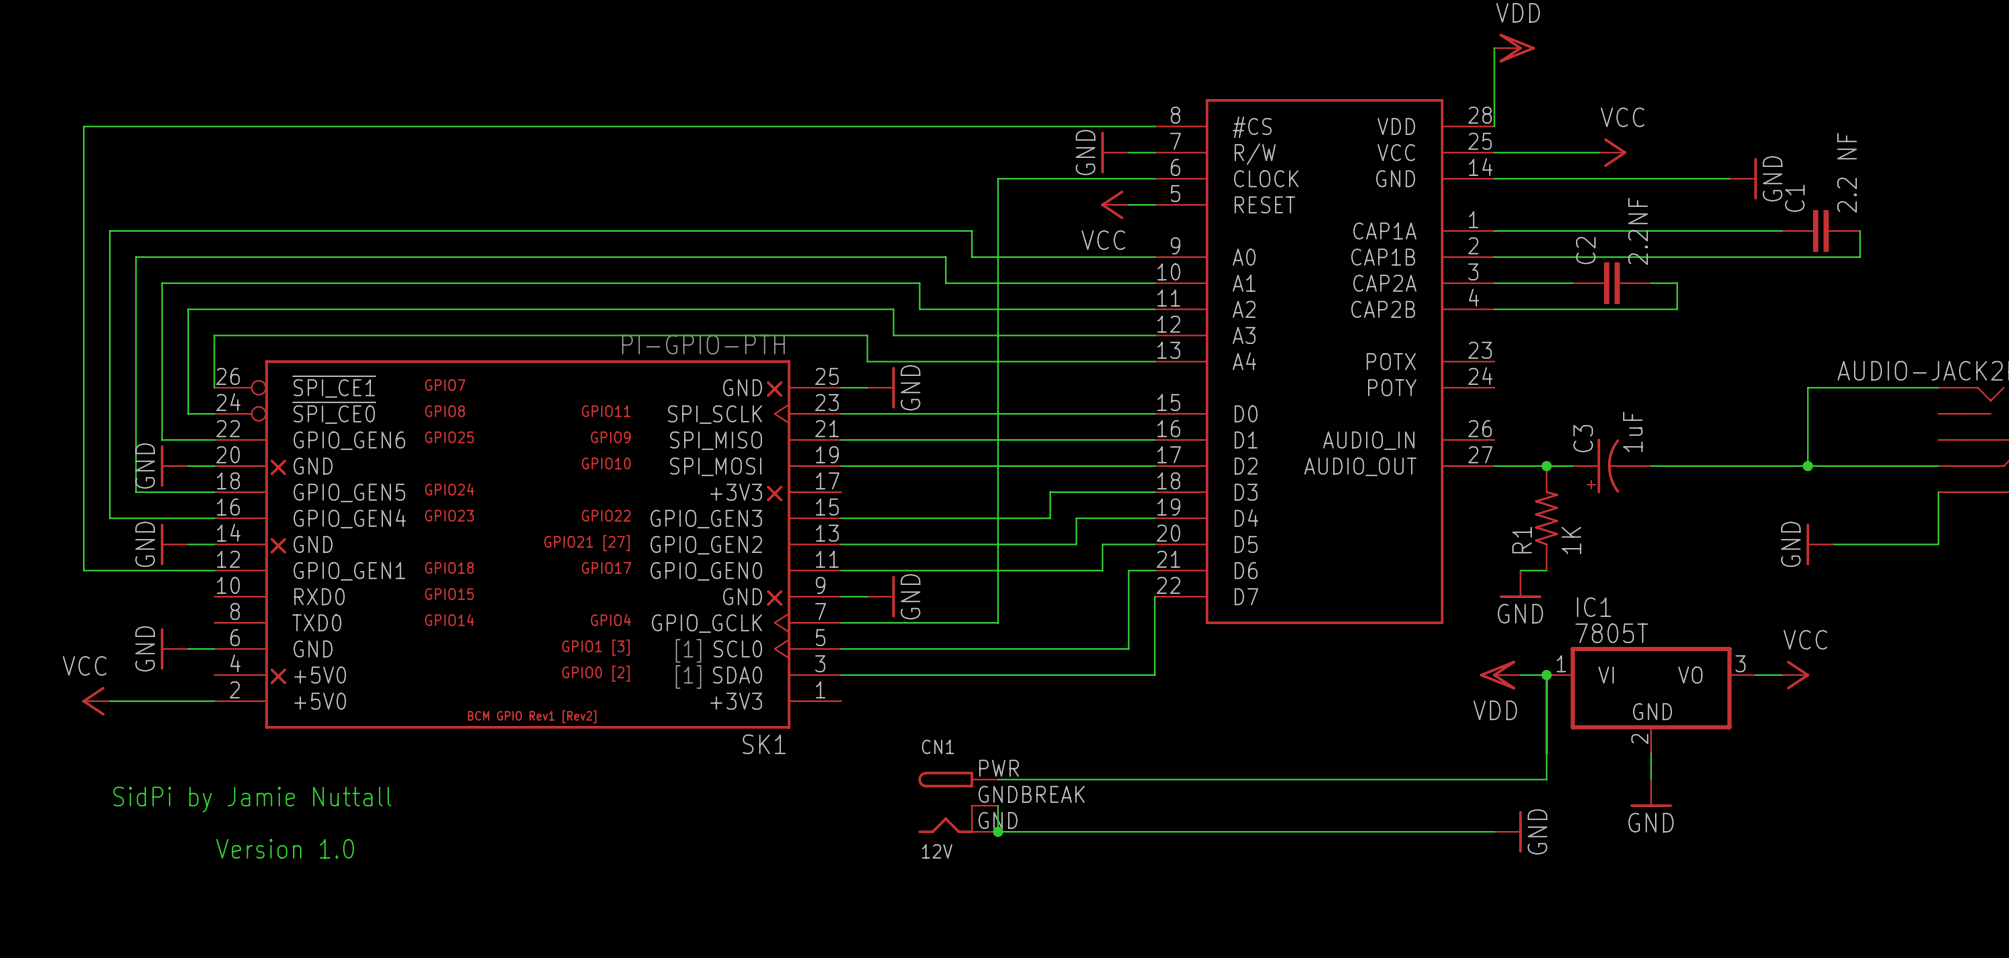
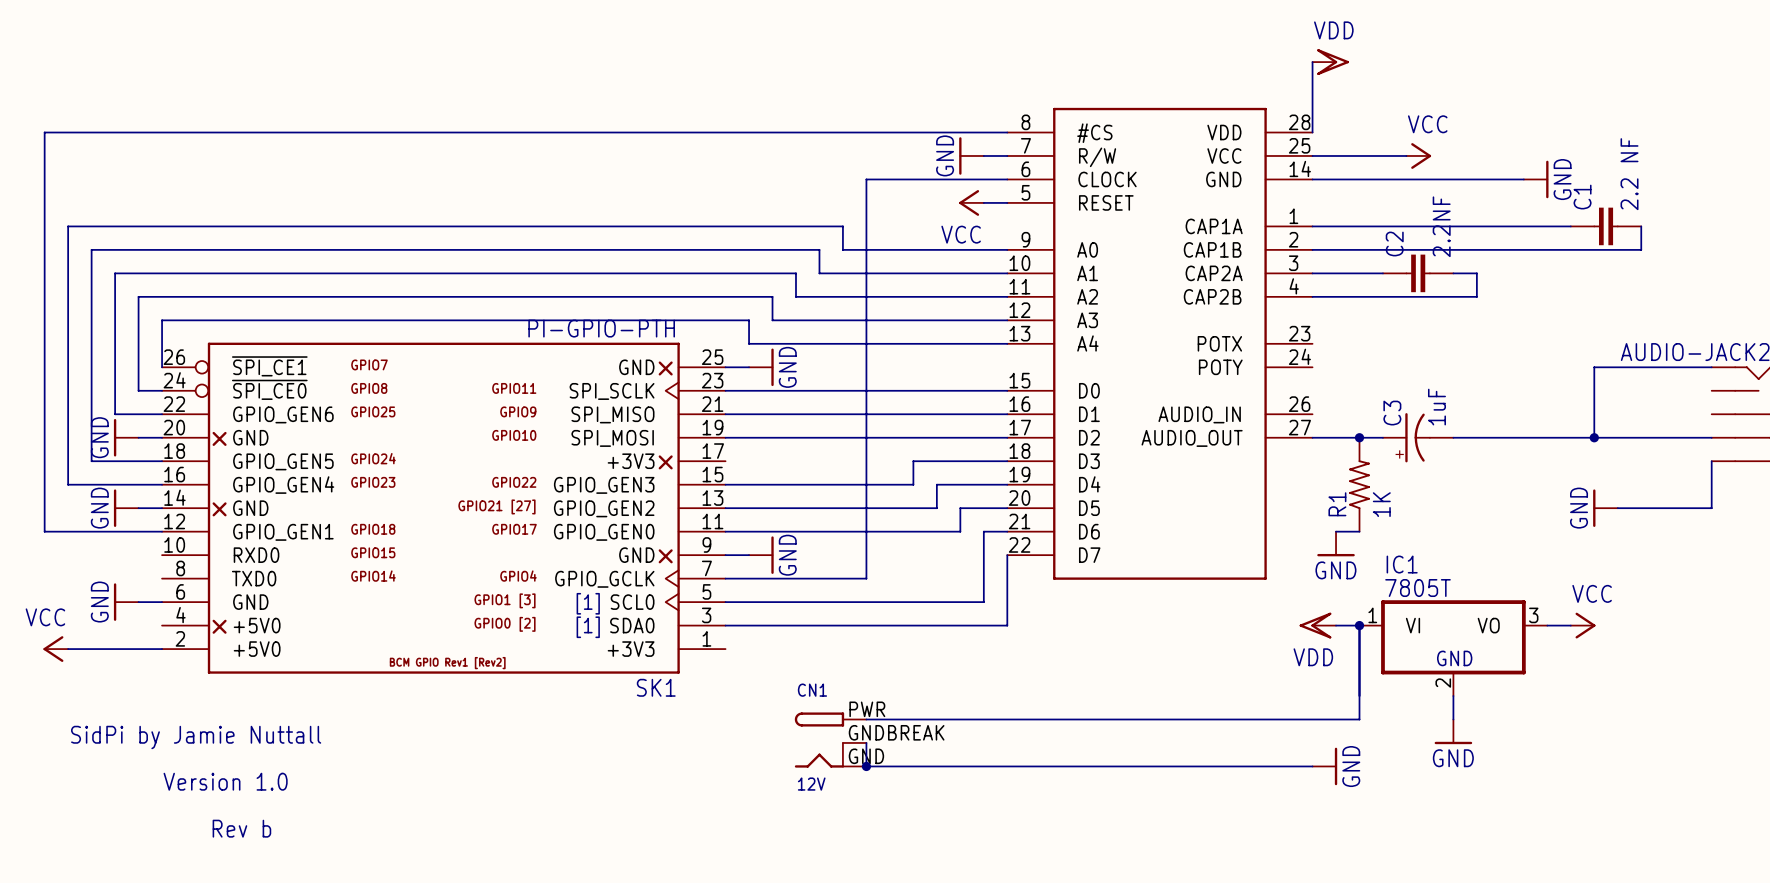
text: none -> Rev b (241, 828)

